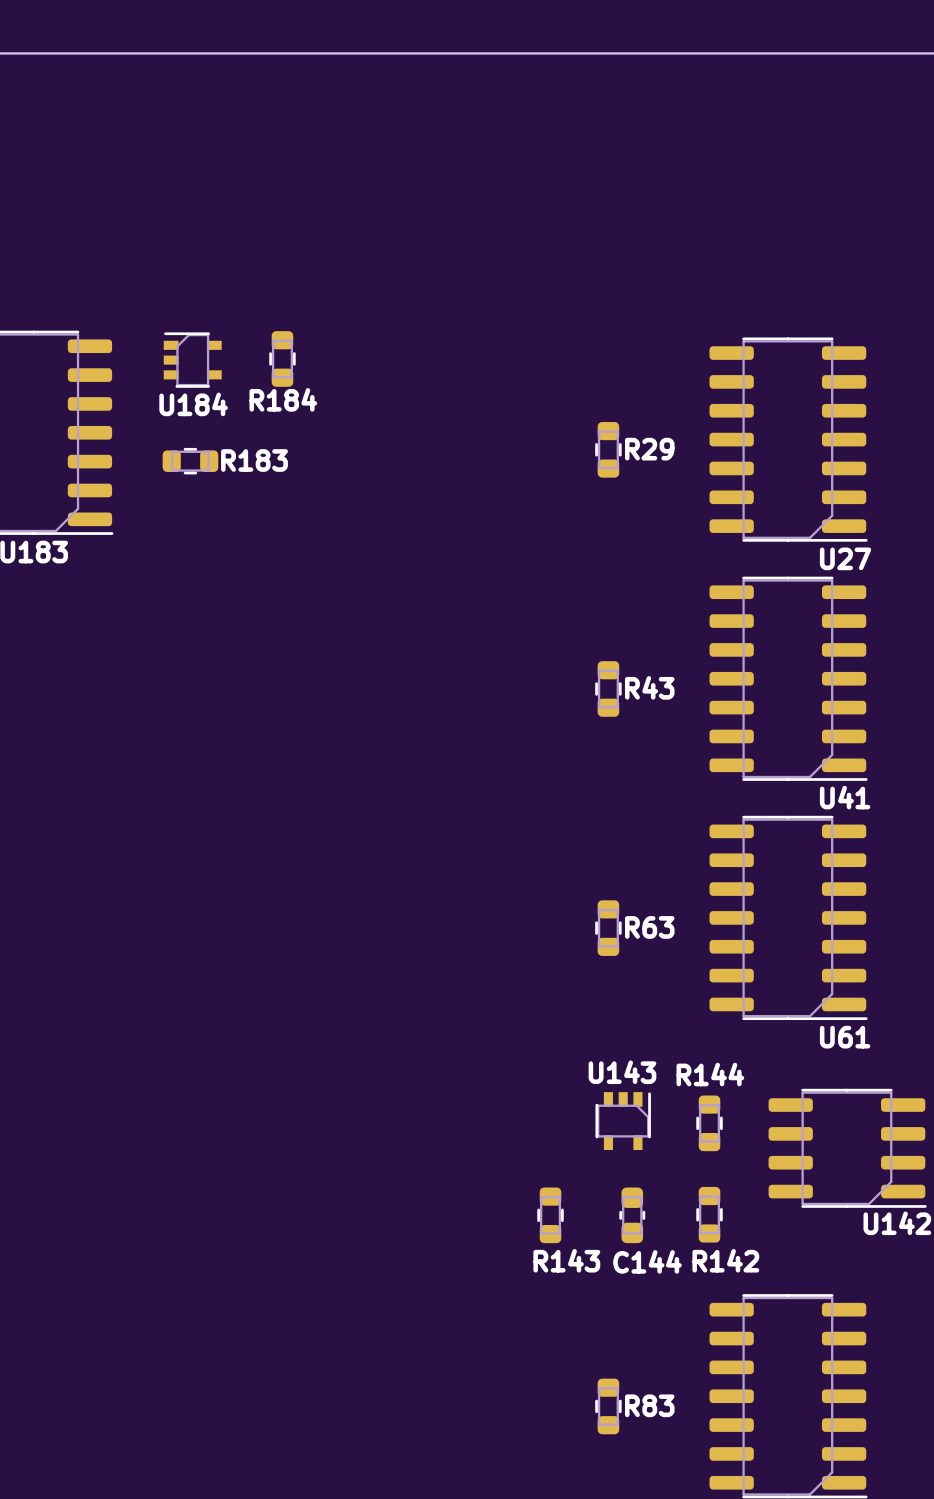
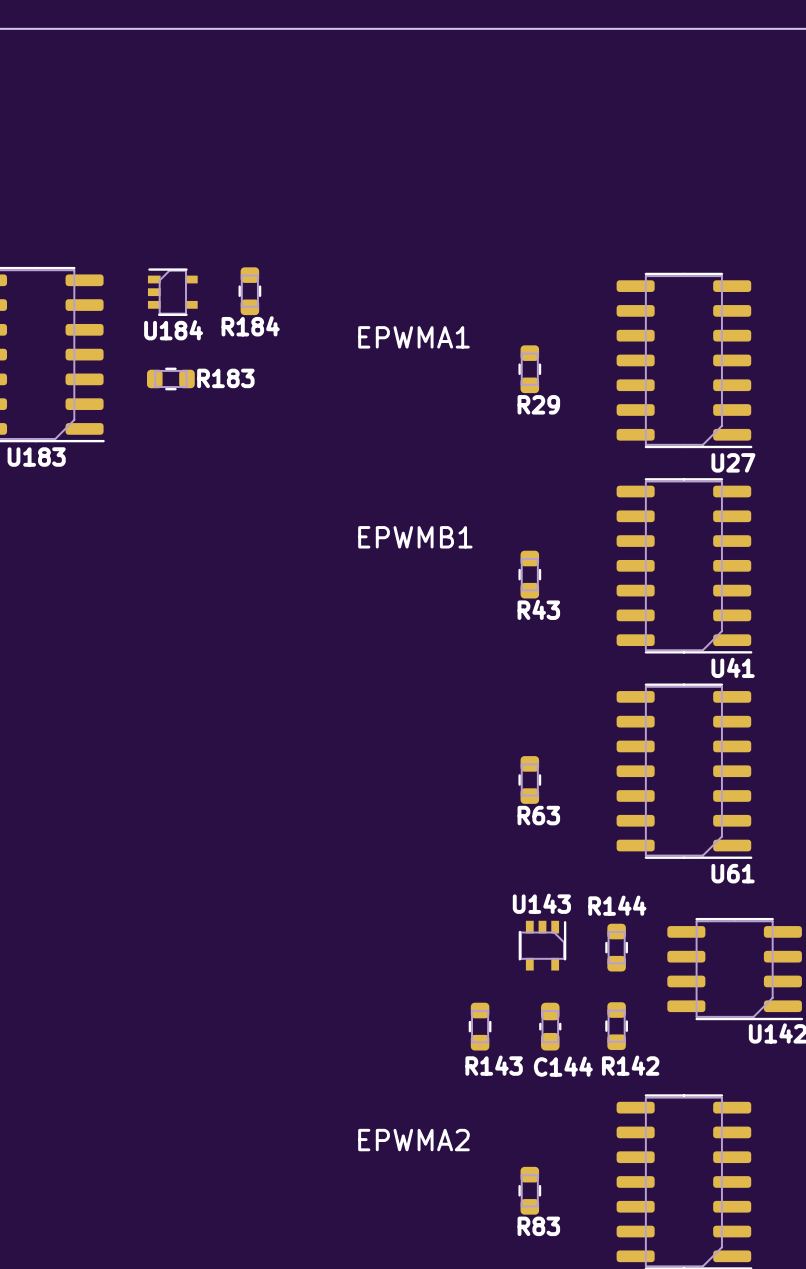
text: none -> EPWMA1 (413, 337)
R29 name position: R29 (649, 449) -> R29 (538, 404)
text: none -> EPWMB1 (415, 537)
R43 name position: R43 (649, 687) -> R43 (538, 609)
R63 name position: R63 (649, 927) -> R63 (538, 815)
text: none -> EPWMA2 (413, 1140)
R83 name position: R83 (649, 1405) -> R83 (538, 1226)

